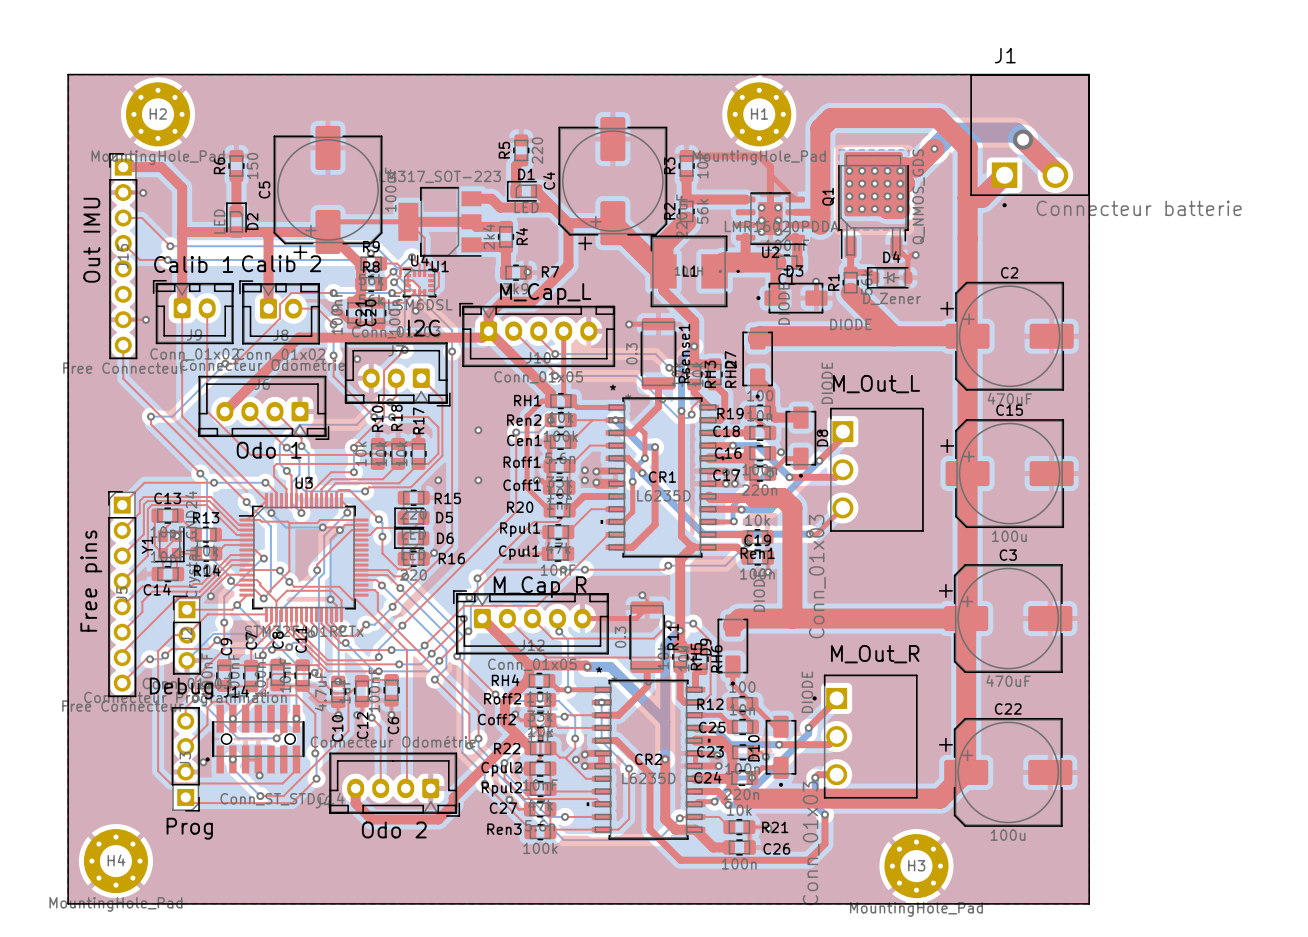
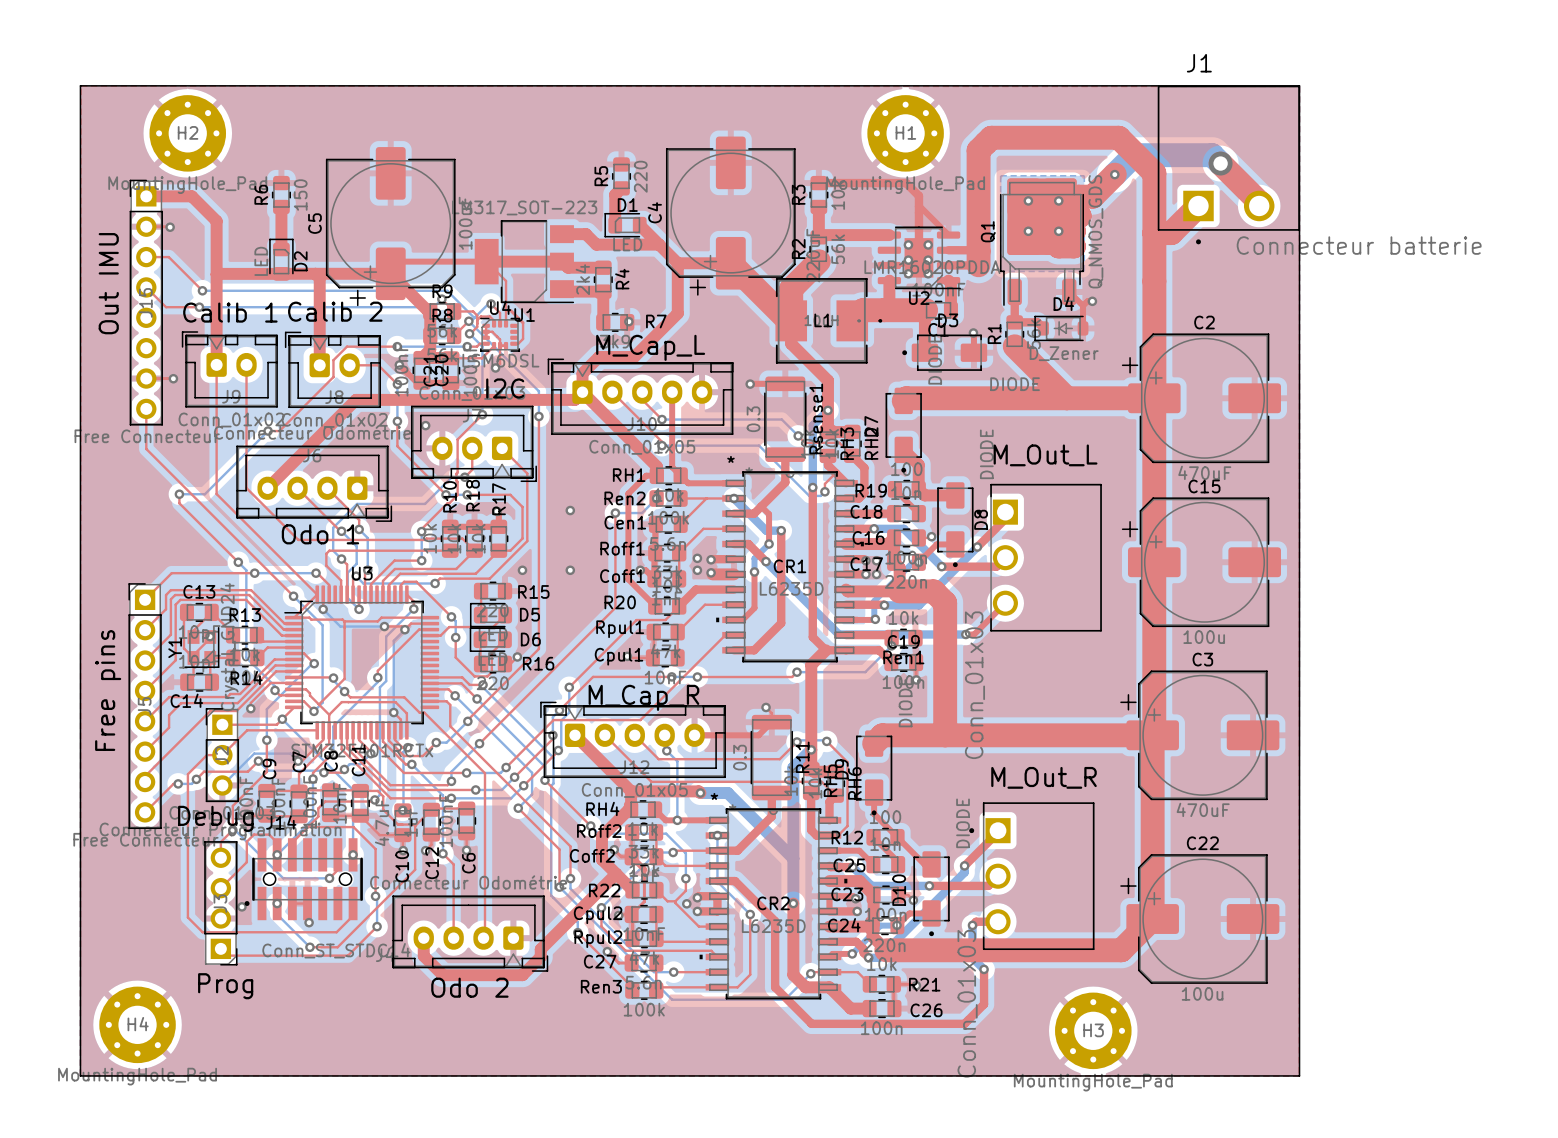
via: (849, 170) -> none
via: (874, 170) -> none
via: (900, 170) -> none
via: (849, 183) -> none
via: (862, 183) -> none
via: (874, 183) -> none
via: (887, 183) -> none
via: (900, 183) -> none
via: (849, 196) -> none
via: (874, 196) -> none
via: (900, 196) -> none
via: (849, 209) -> none
via: (862, 209) -> none
via: (874, 209) -> none
via: (887, 209) -> none
via: (900, 209) -> none

